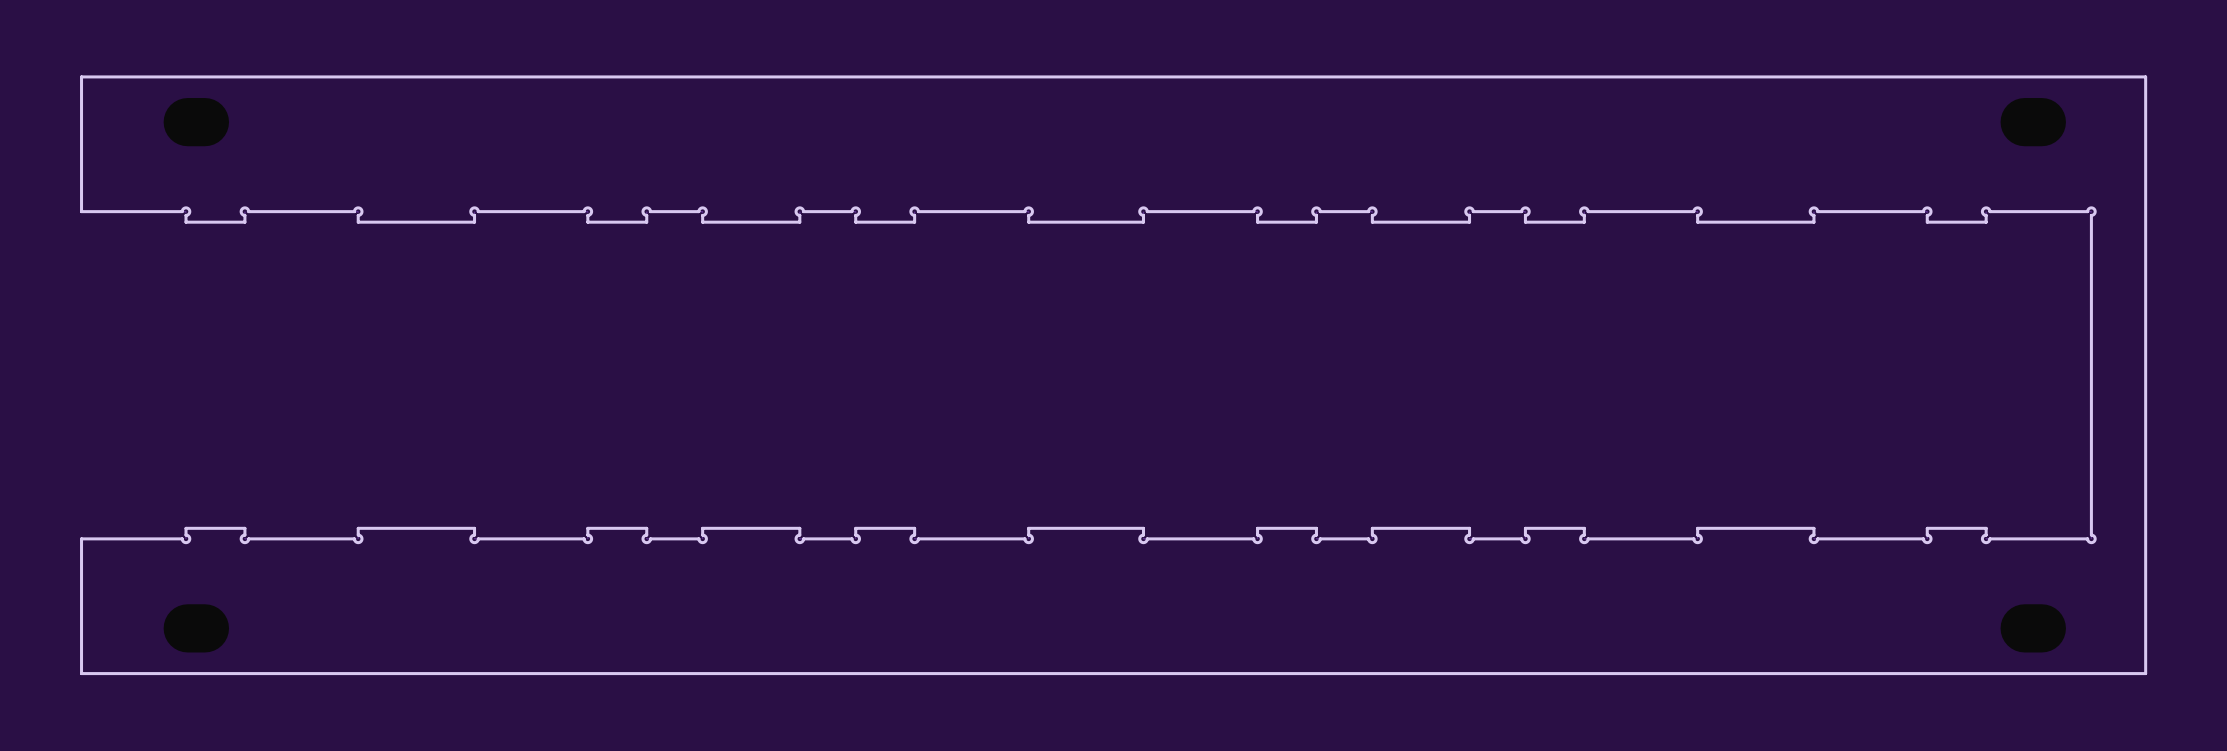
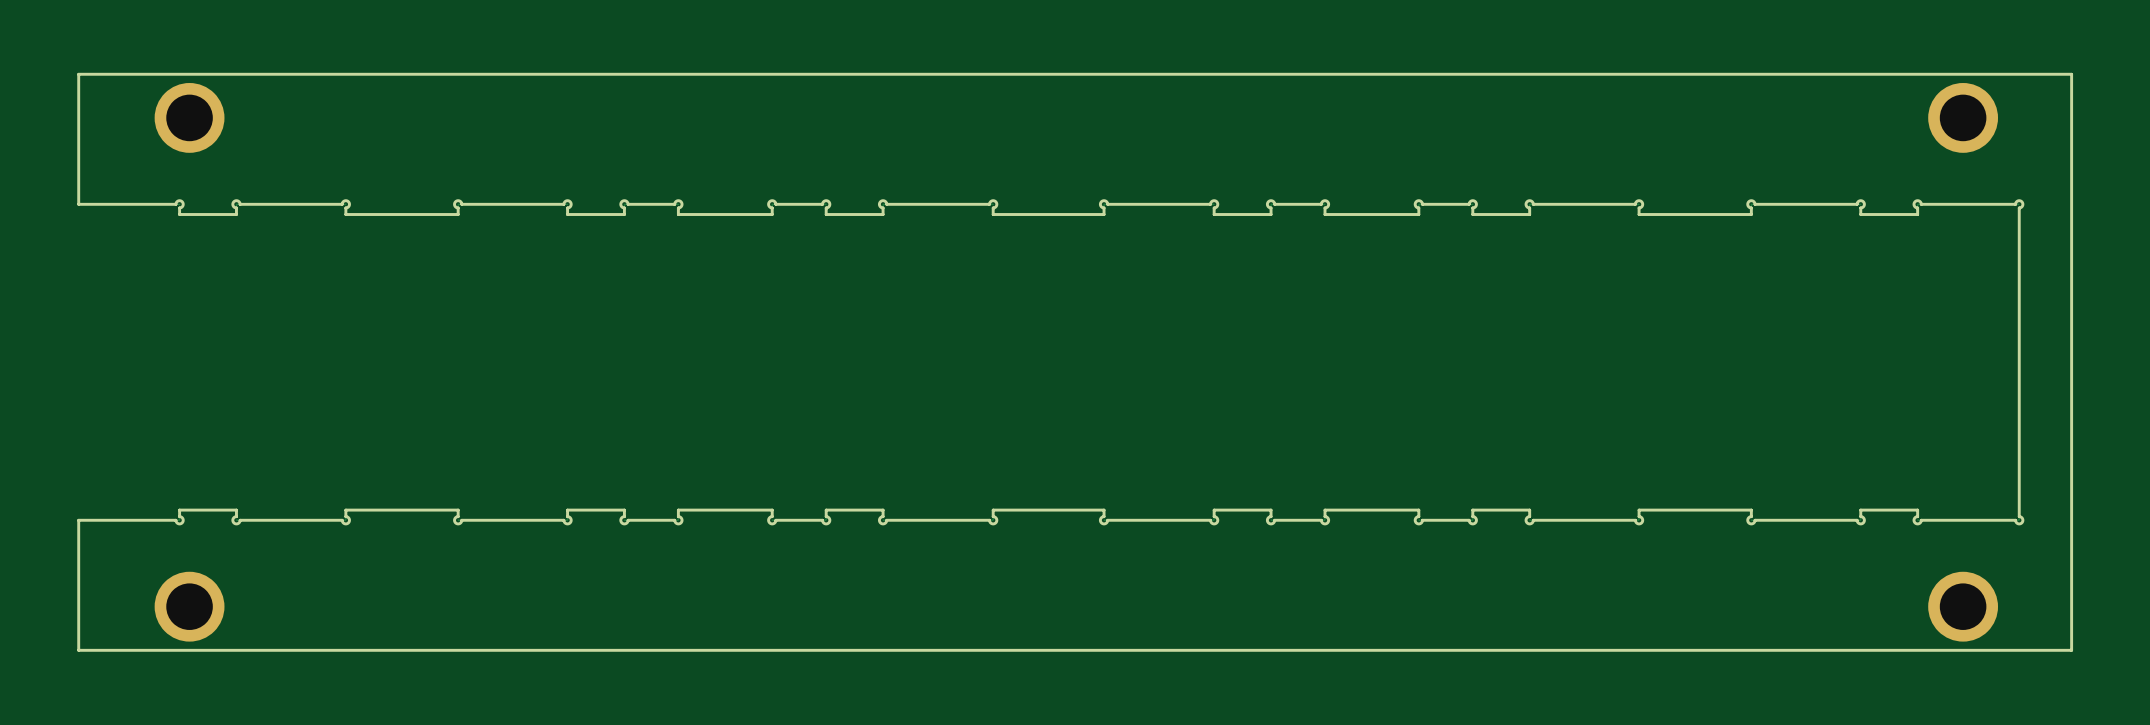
part footprint: [163, 98, 230, 147] -> [154, 83, 225, 153]
part footprint: [2000, 98, 2066, 147] -> [1928, 83, 1999, 153]
part footprint: [163, 604, 230, 653] -> [154, 571, 225, 642]
part footprint: [2000, 604, 2066, 653] -> [1928, 571, 1999, 642]

